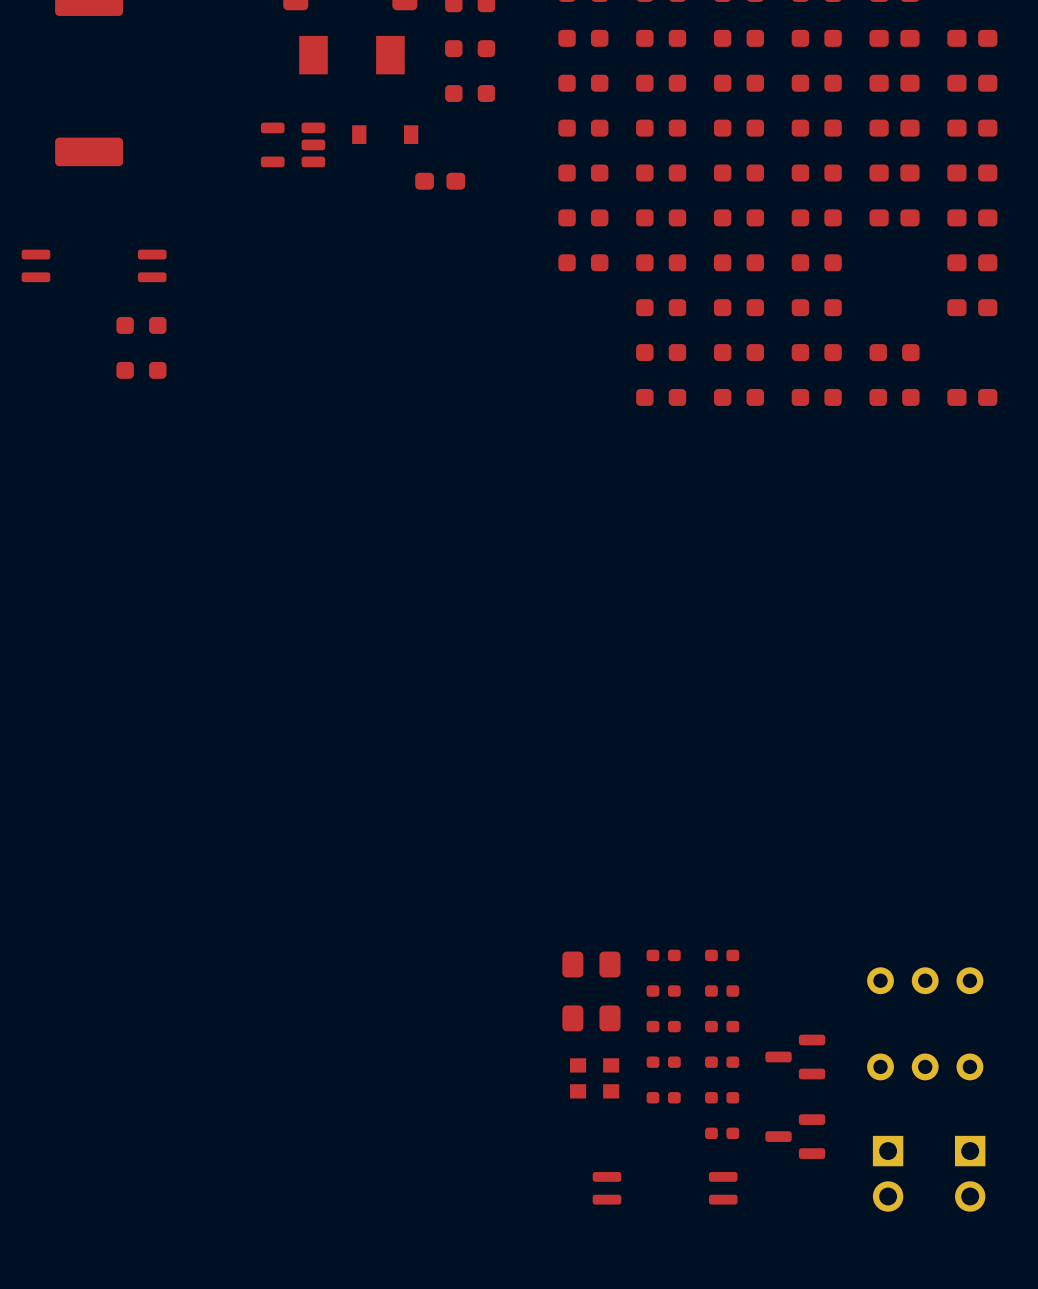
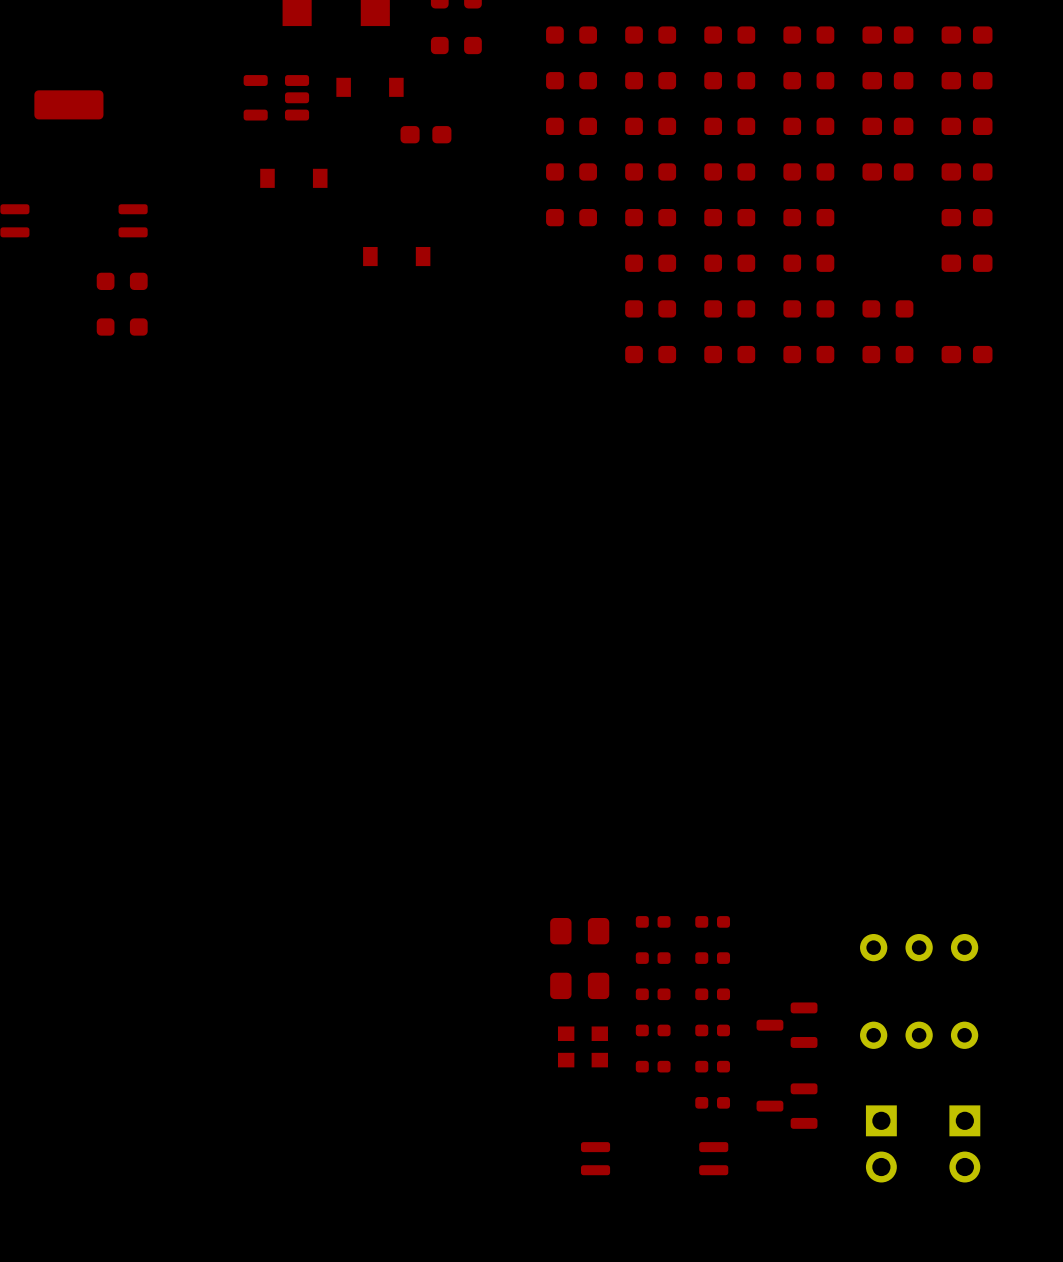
part: none -> (293, 178)
part: none -> (396, 256)

